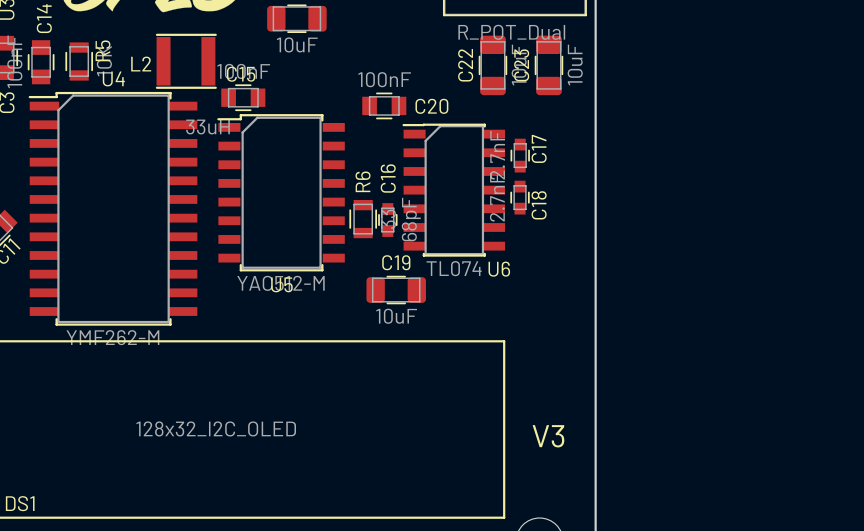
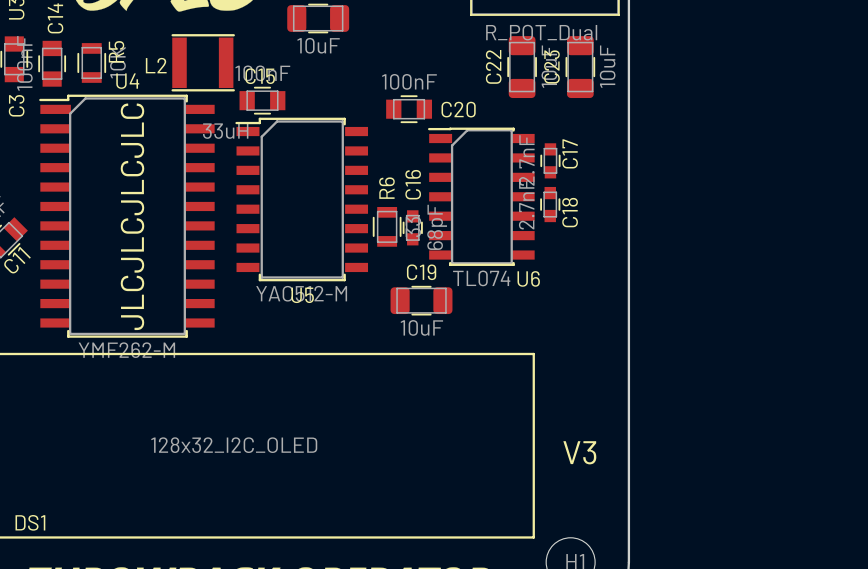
text: none -> JLCJLCJLCJLC (132, 216)

